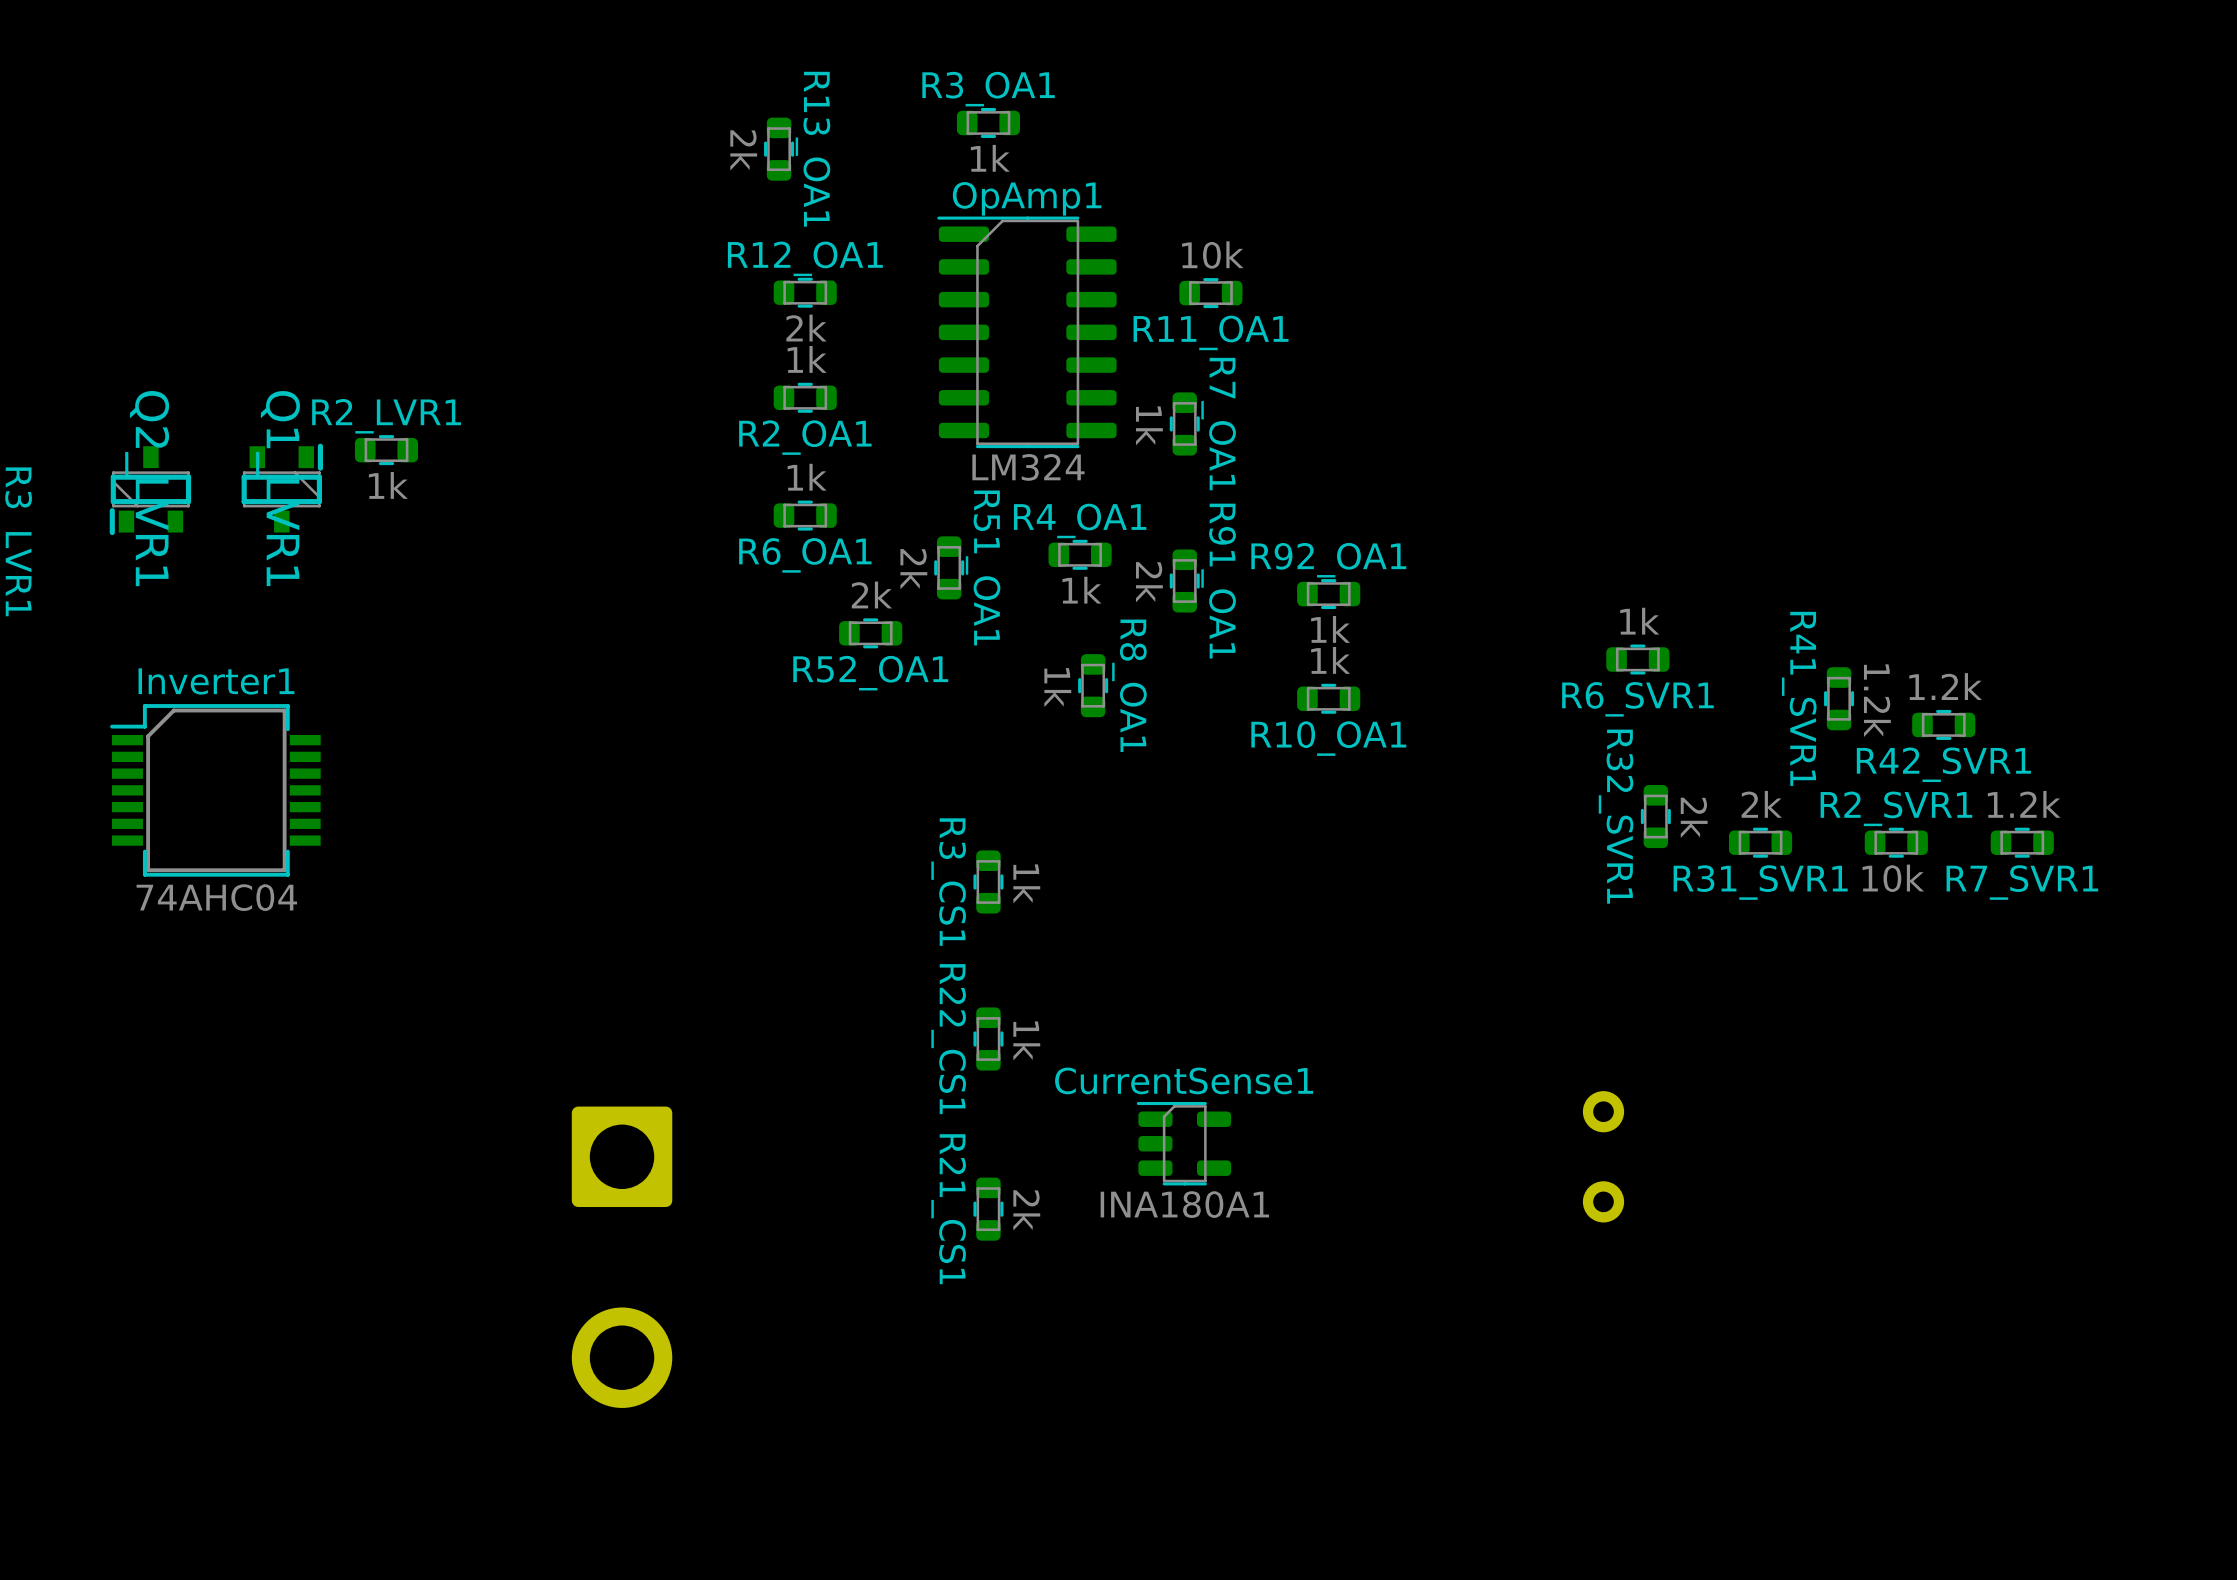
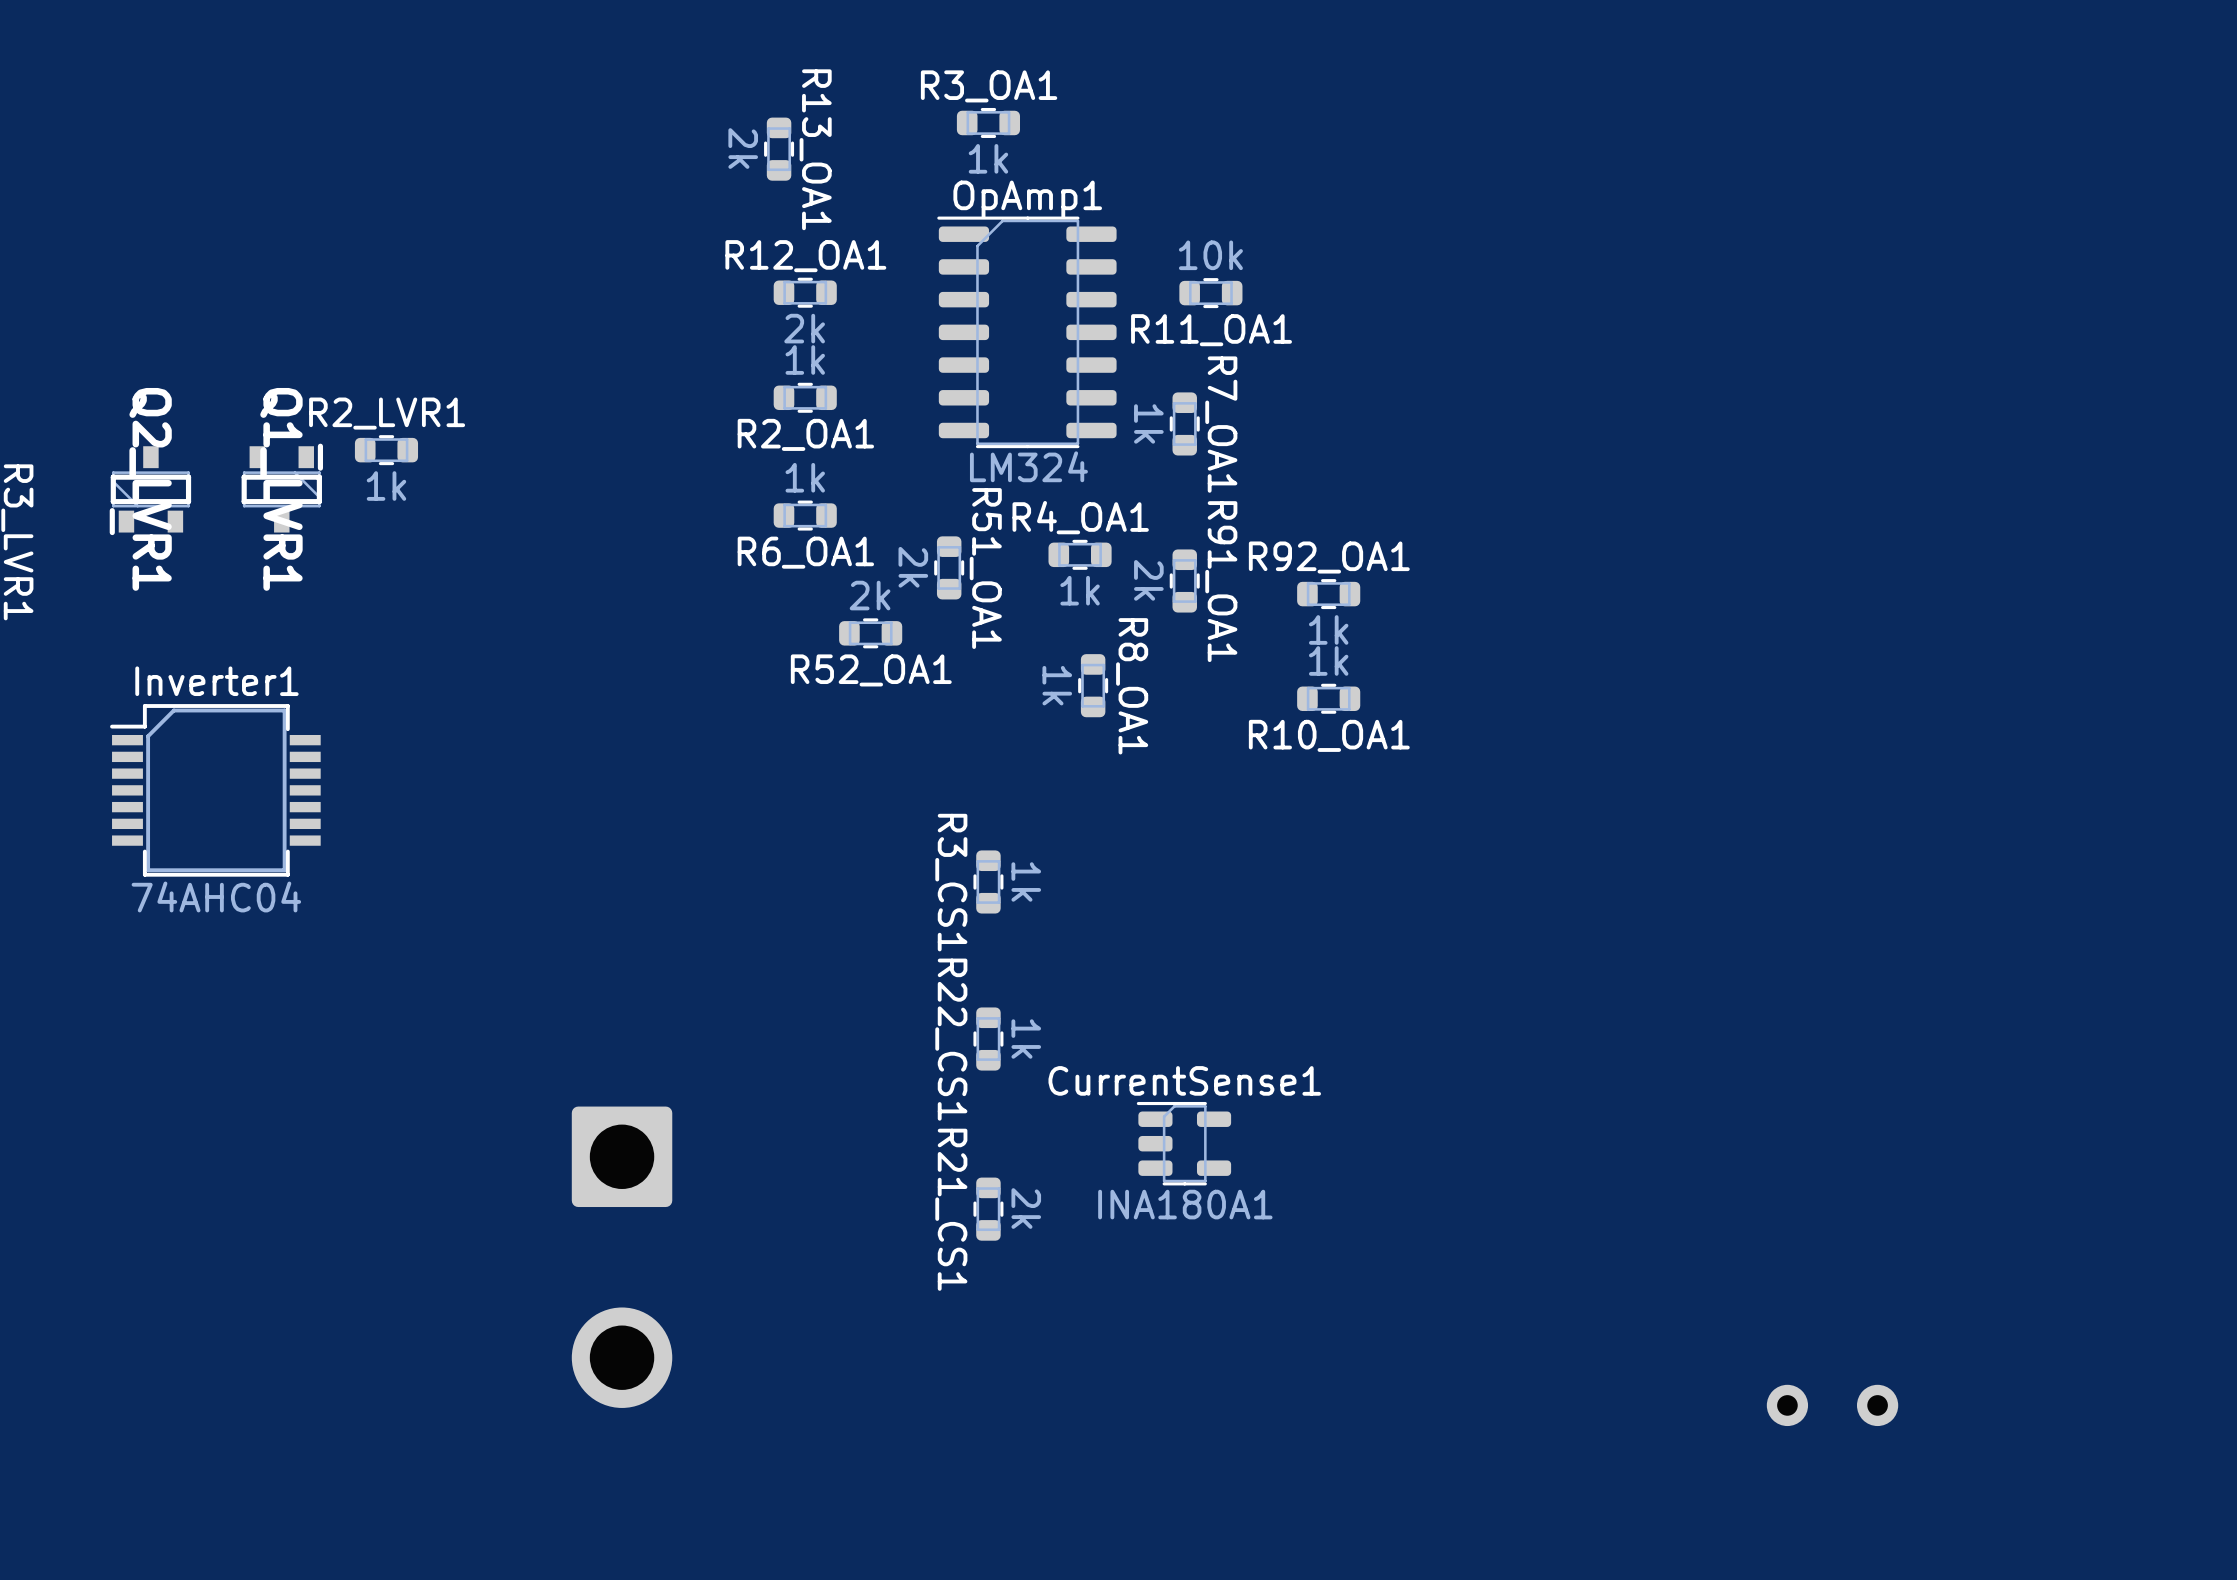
R6_SVR1: 1k (1637, 659) -> none
R41_SVR1: 1.2k (1839, 698) -> none
R42_SVR1: 1.2k (1943, 724) -> none
R32_SVR1: 2k (1655, 816) -> none
R31_SVR1: 2k (1760, 842) -> none
R2_SVR1: 10k (1896, 842) -> none
R7_SVR1: 1.2k (2022, 842) -> none
part rotation: 0° (1603, 1156) -> 90° clockwise (1832, 1405)
part position: (1603, 1156) -> (1832, 1405)

